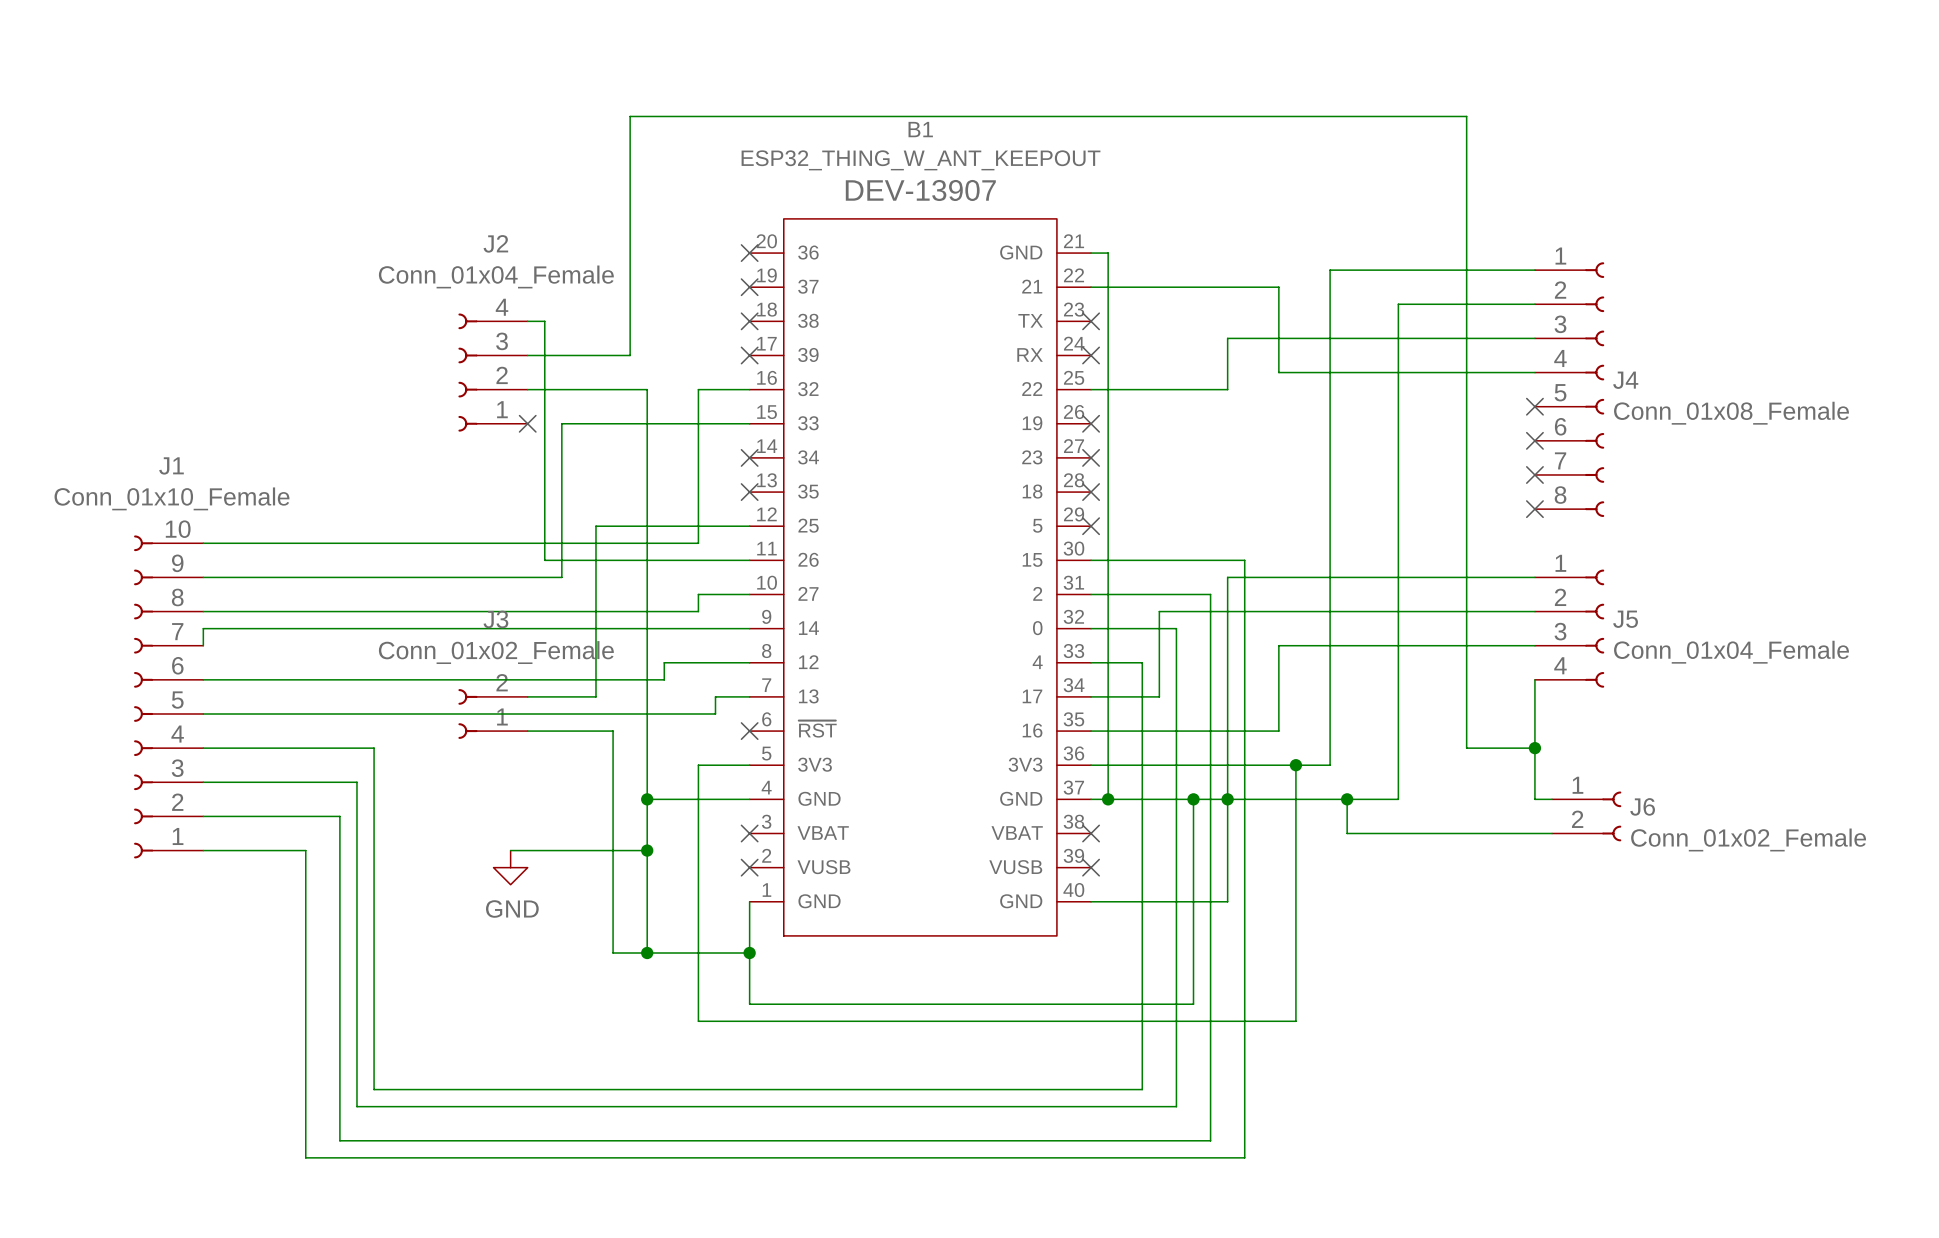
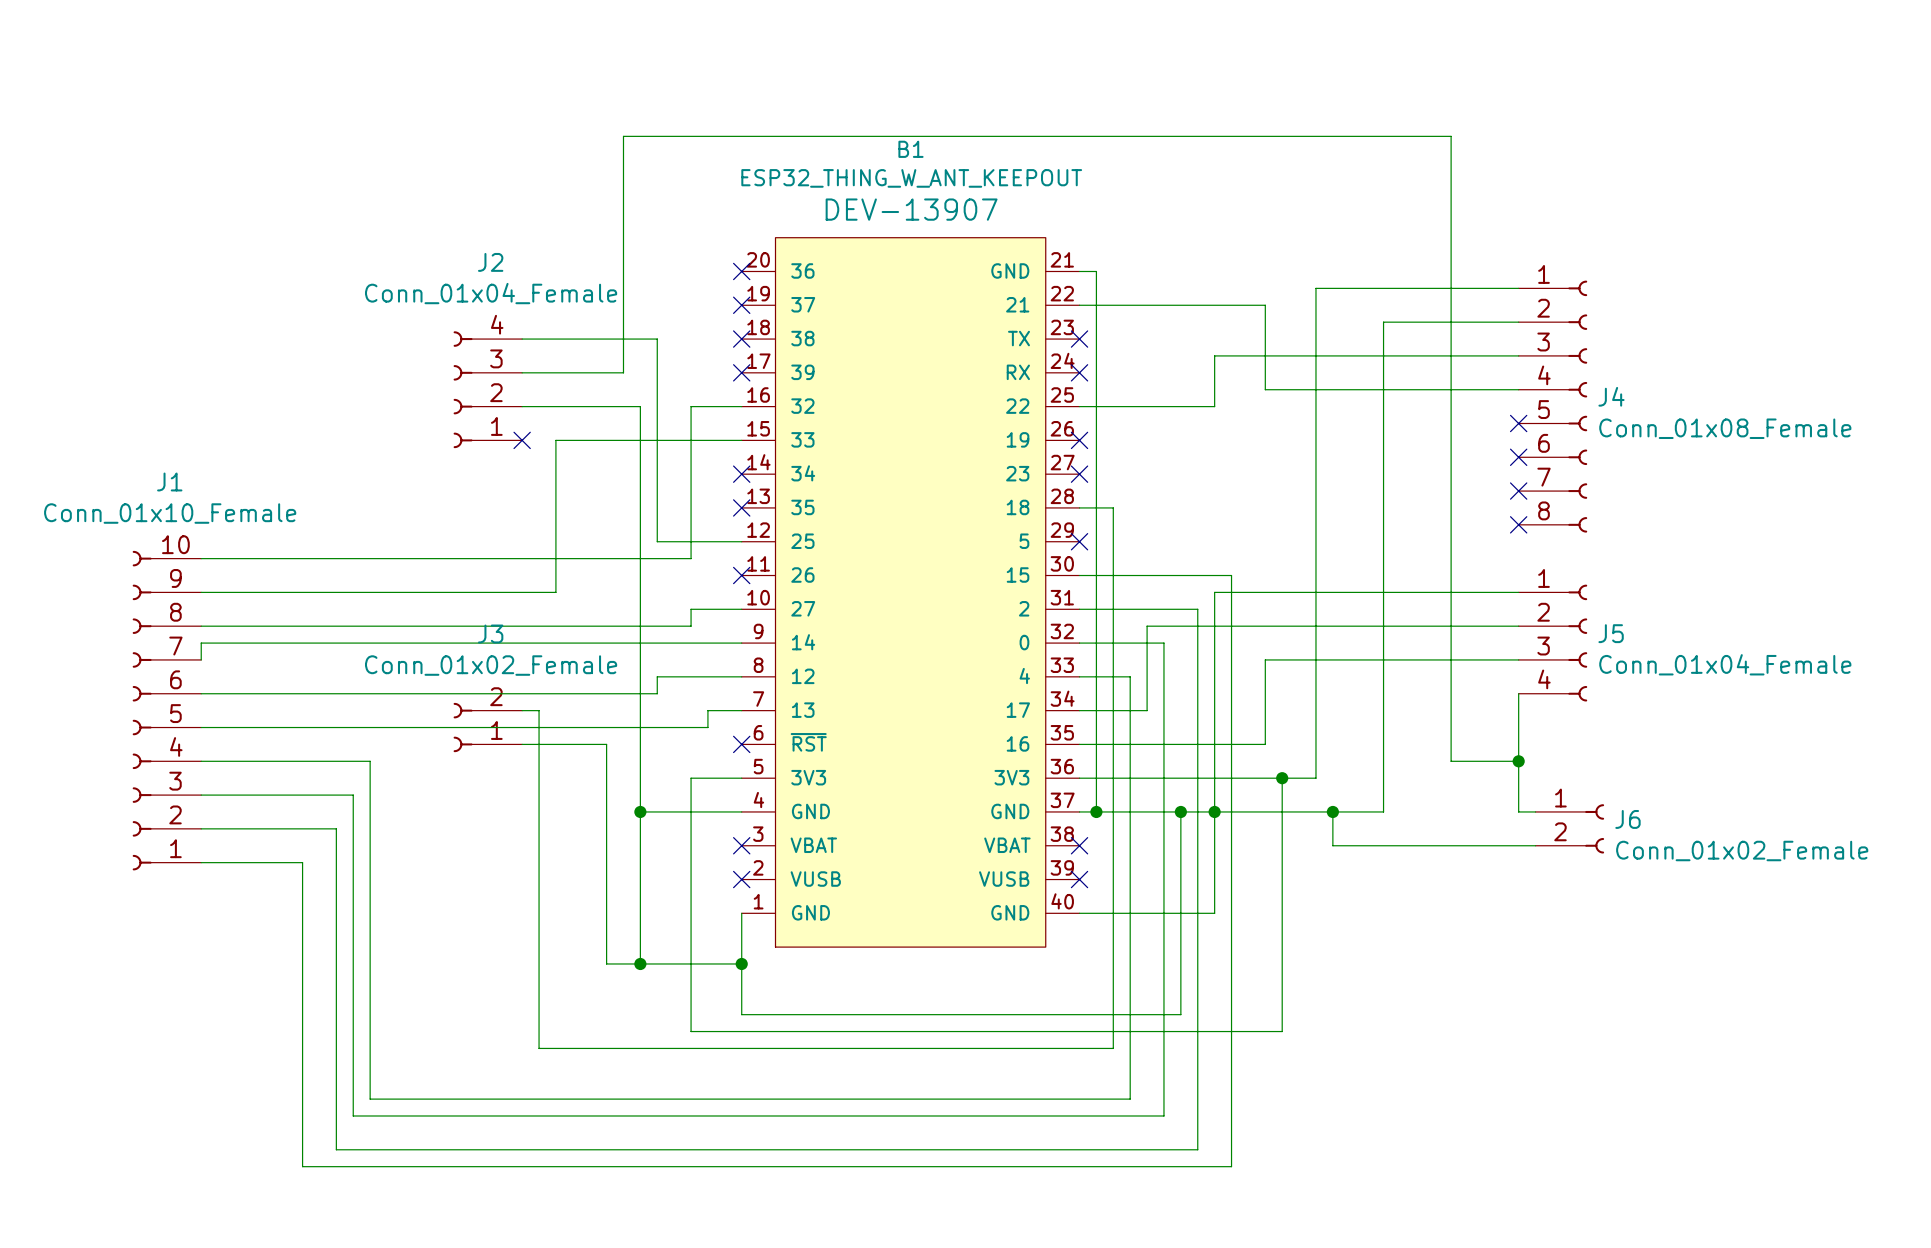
wire: (544, 321) (544, 560) (749, 560) -> (539, 339) (657, 339) (657, 541)
no-connect mark: (1091, 492) -> none
wire: (664, 526) (595, 526) (595, 696) (544, 696) -> (1079, 507) (1113, 507) (1113, 1048) (539, 1048) (539, 710)
no-connect mark: none -> (741, 575)
wire: (510, 850) (647, 850) -> none
junction: (647, 850) -> none
power symbol: GND (510, 867) -> none

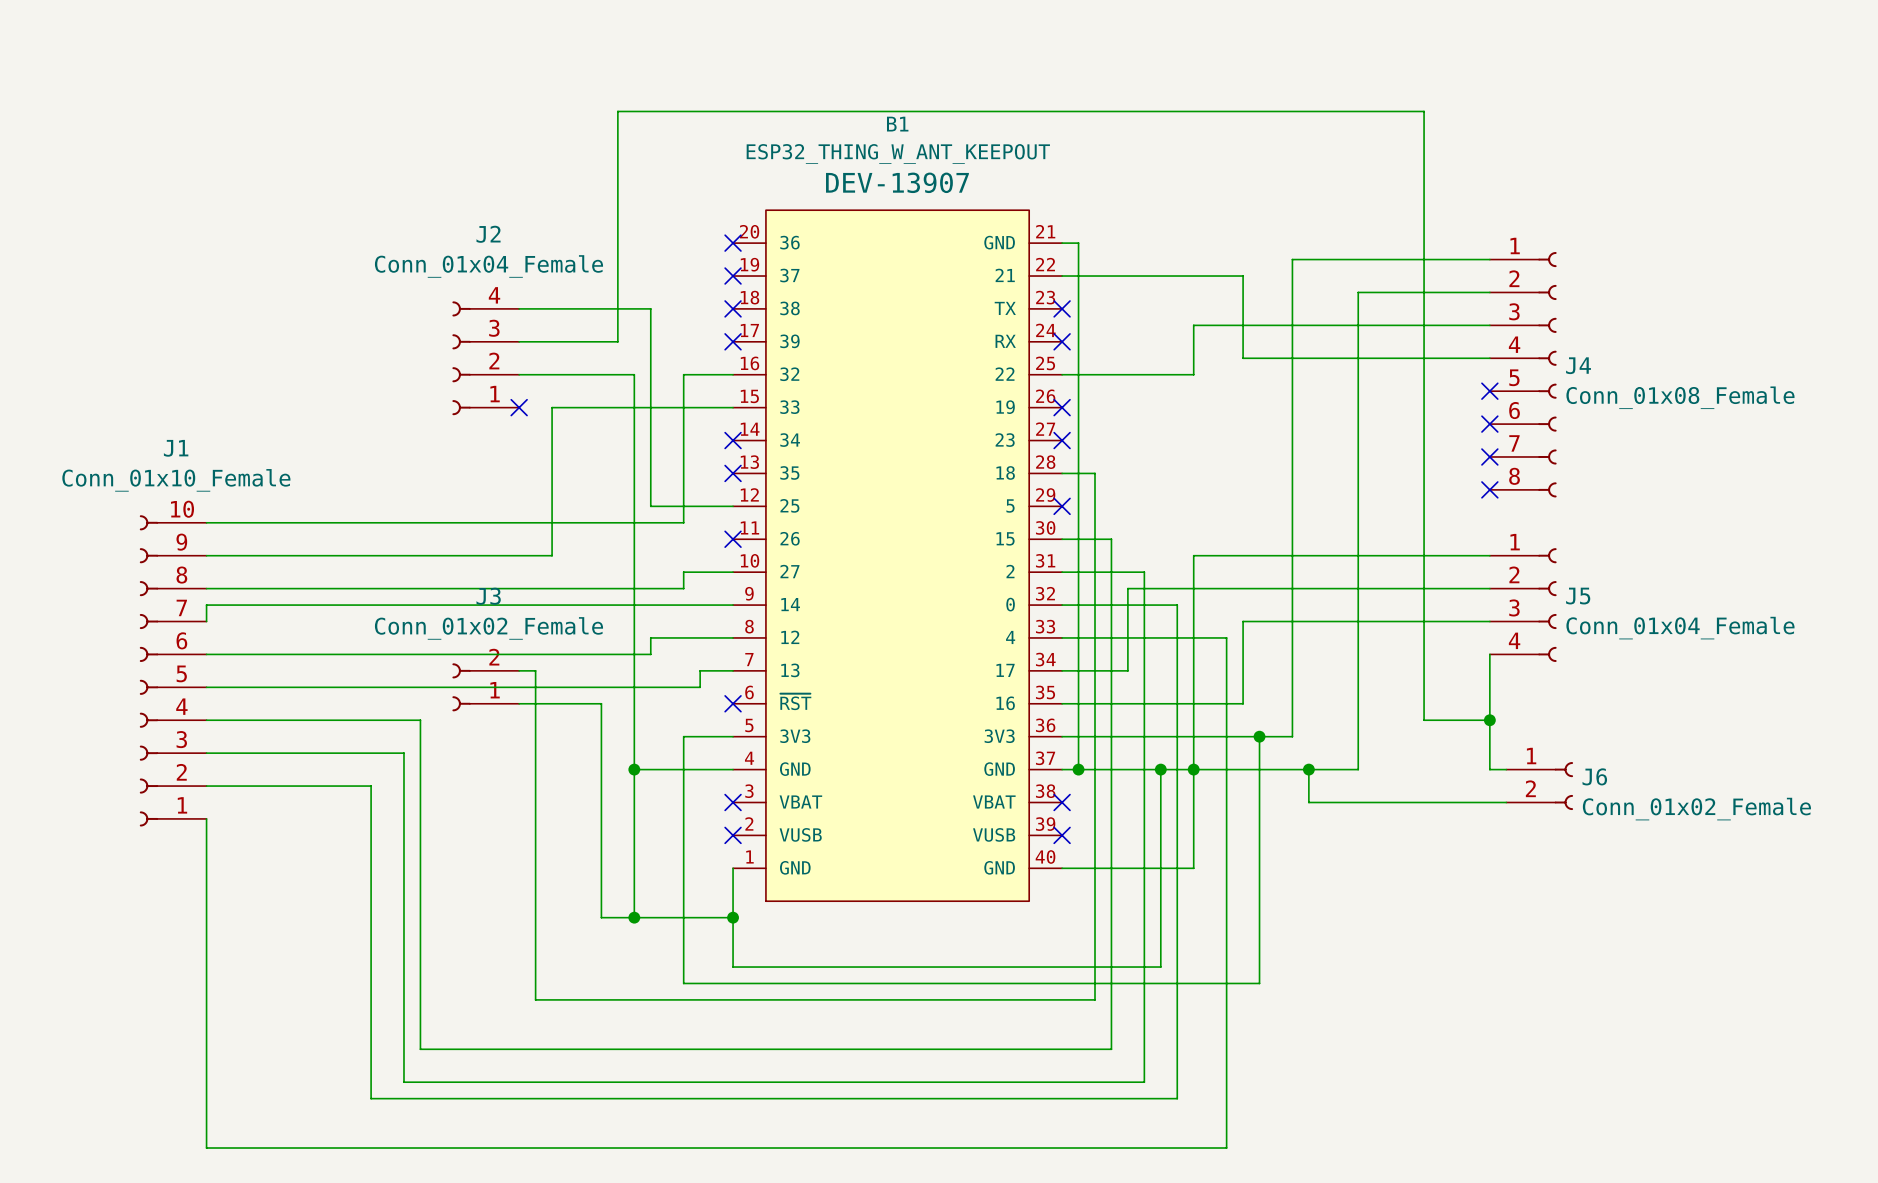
wire: (1130, 575) (1231, 575) (1231, 1166) (302, 1166) (302, 862) (201, 862) -> (1111, 539) (1111, 637) (1226, 637) (1226, 1148) (206, 1148) (206, 818)
wire: (1163, 609) (1197, 609) (1197, 643) -> (1144, 572) (1144, 605) (1177, 605)
wire: (370, 761) (370, 828) -> (338, 786) (371, 786)
wire: none -> (371, 720) (420, 720) (420, 1049)
wire: (353, 795) (353, 1115) (1163, 1115) -> (354, 753) (403, 753) (403, 1082) (1144, 1082) (1144, 1065)
wire: (336, 828) (336, 1149) (370, 1149) -> none
wire: (370, 1099) (420, 1099) -> (371, 1049) (371, 1098)

